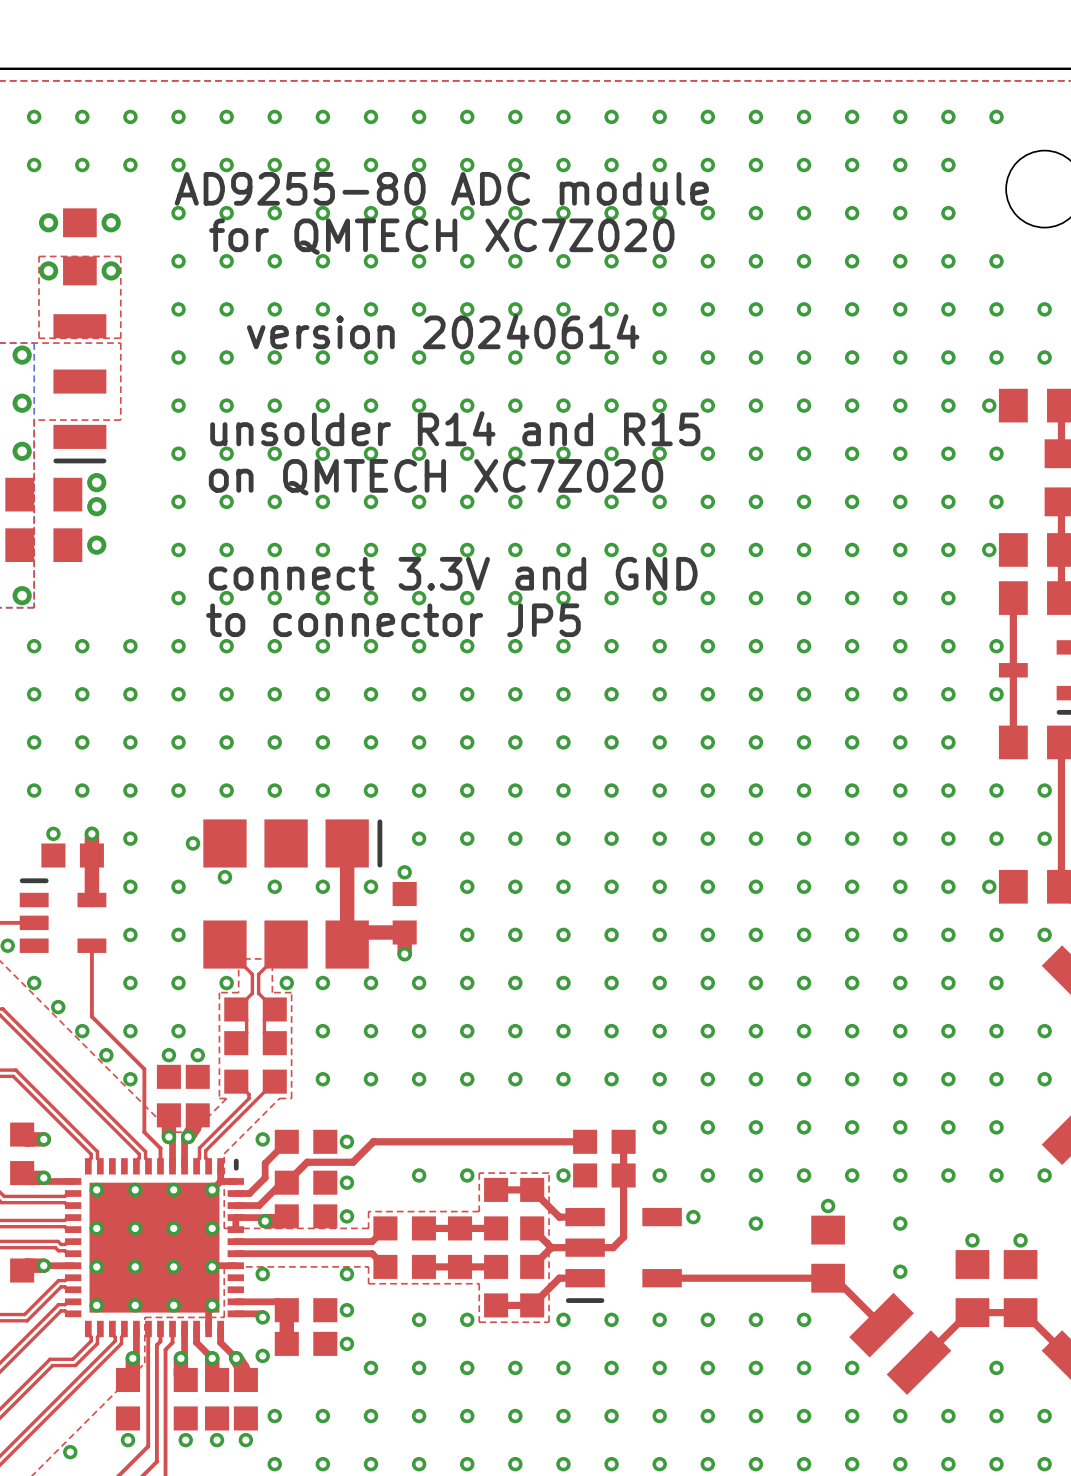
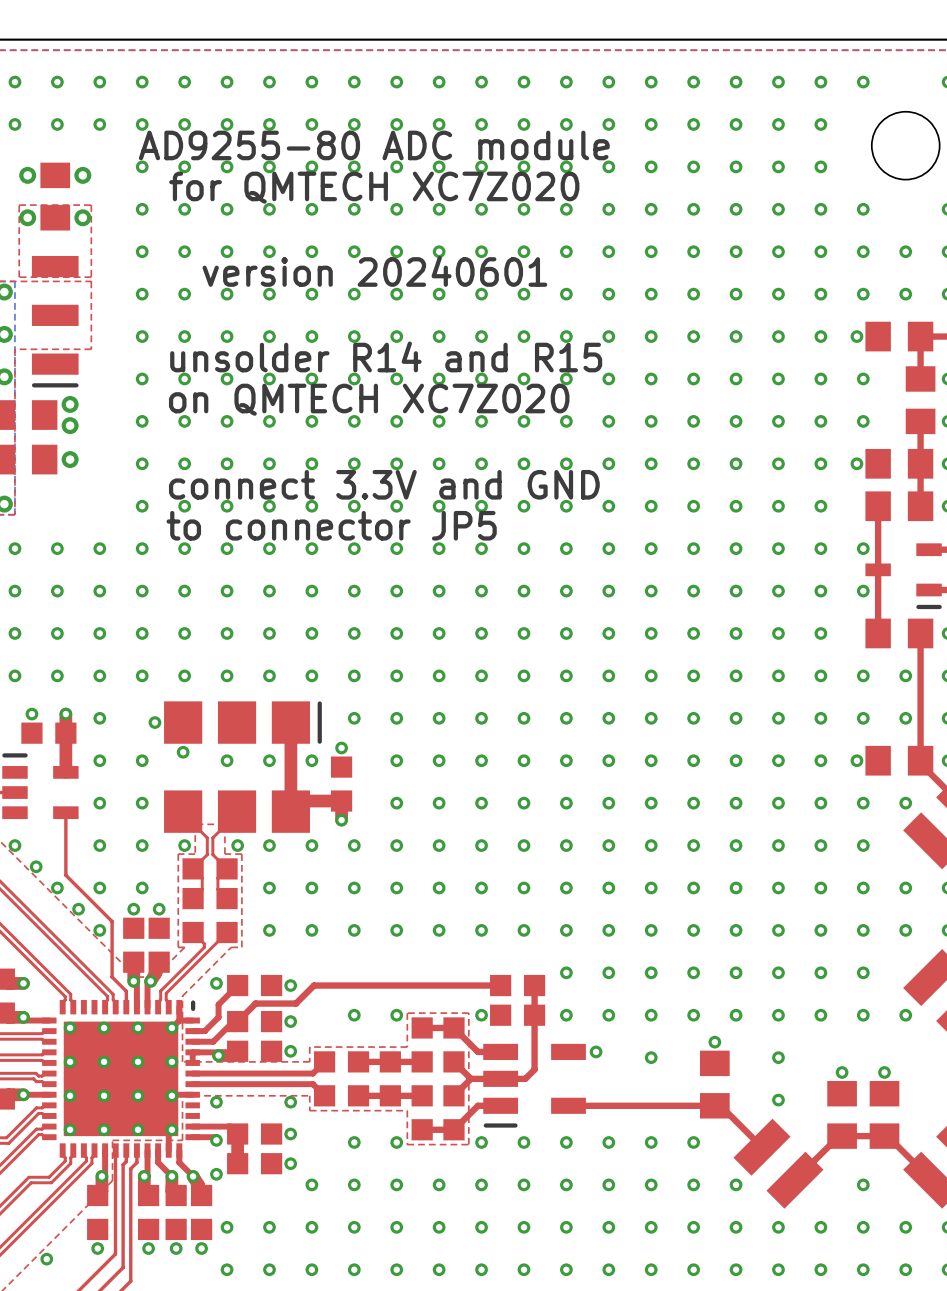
text: version 20240614 (443, 331) -> version 20240601 (374, 271)

